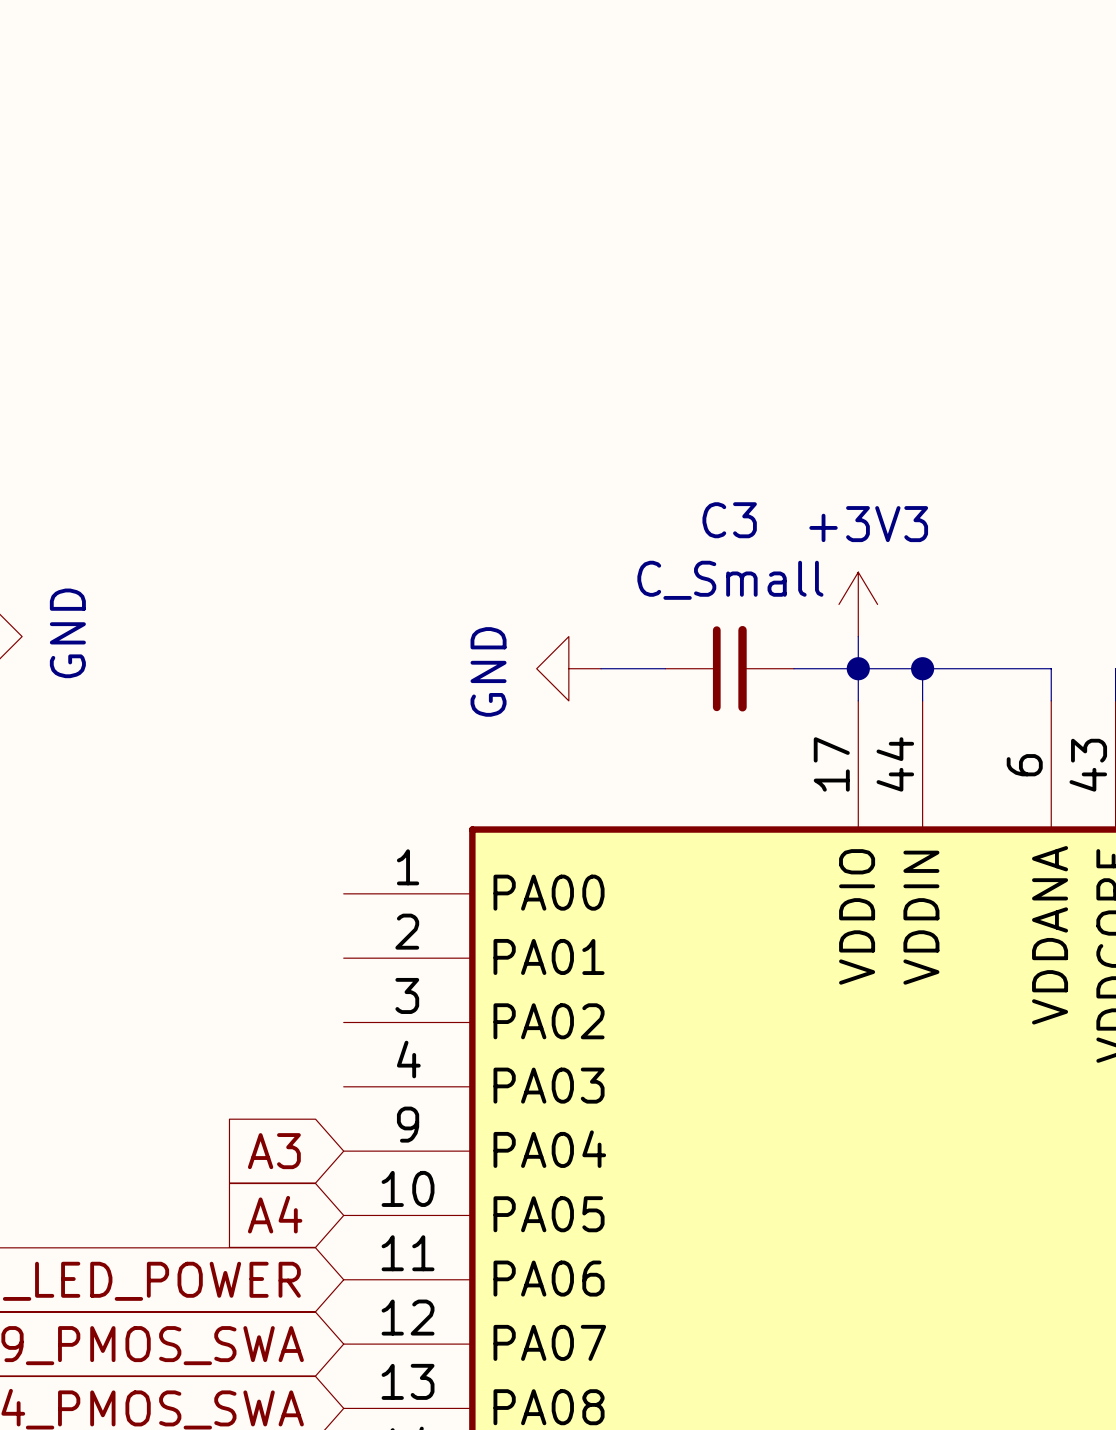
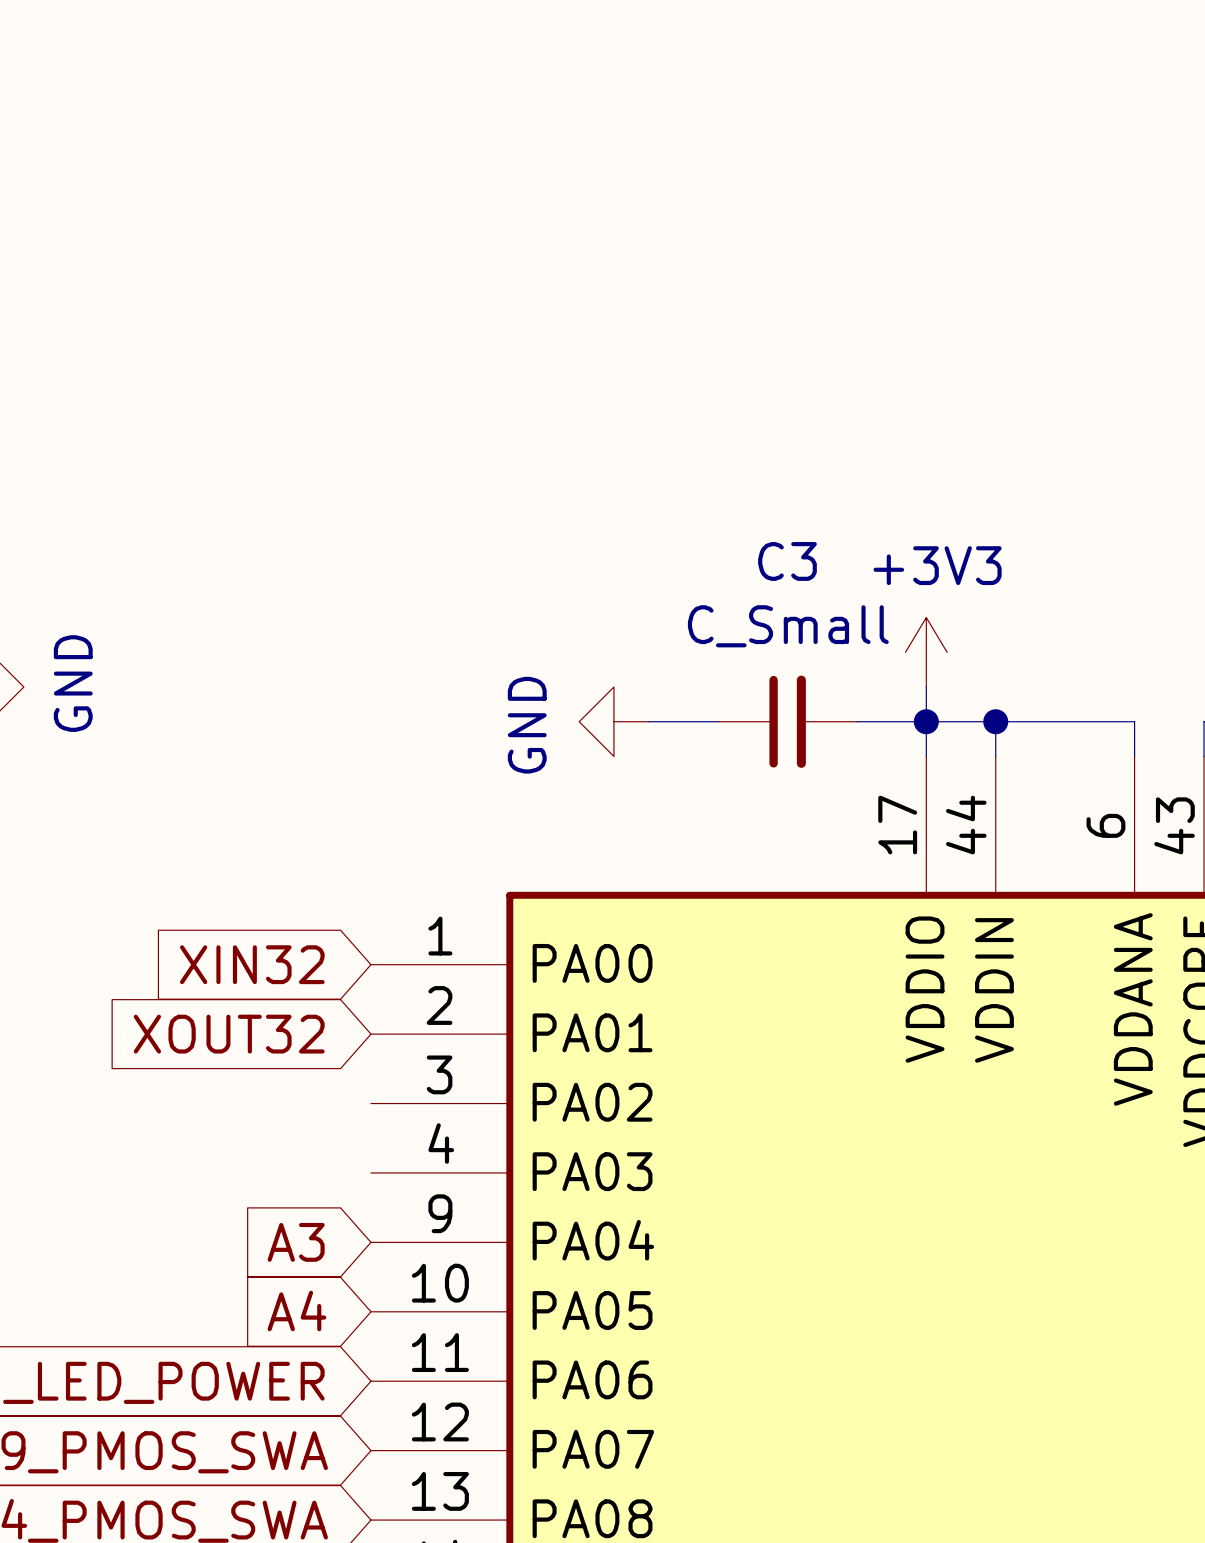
global label: none -> XIN32 (252, 964)
global label: none -> XOUT32 (229, 1034)

